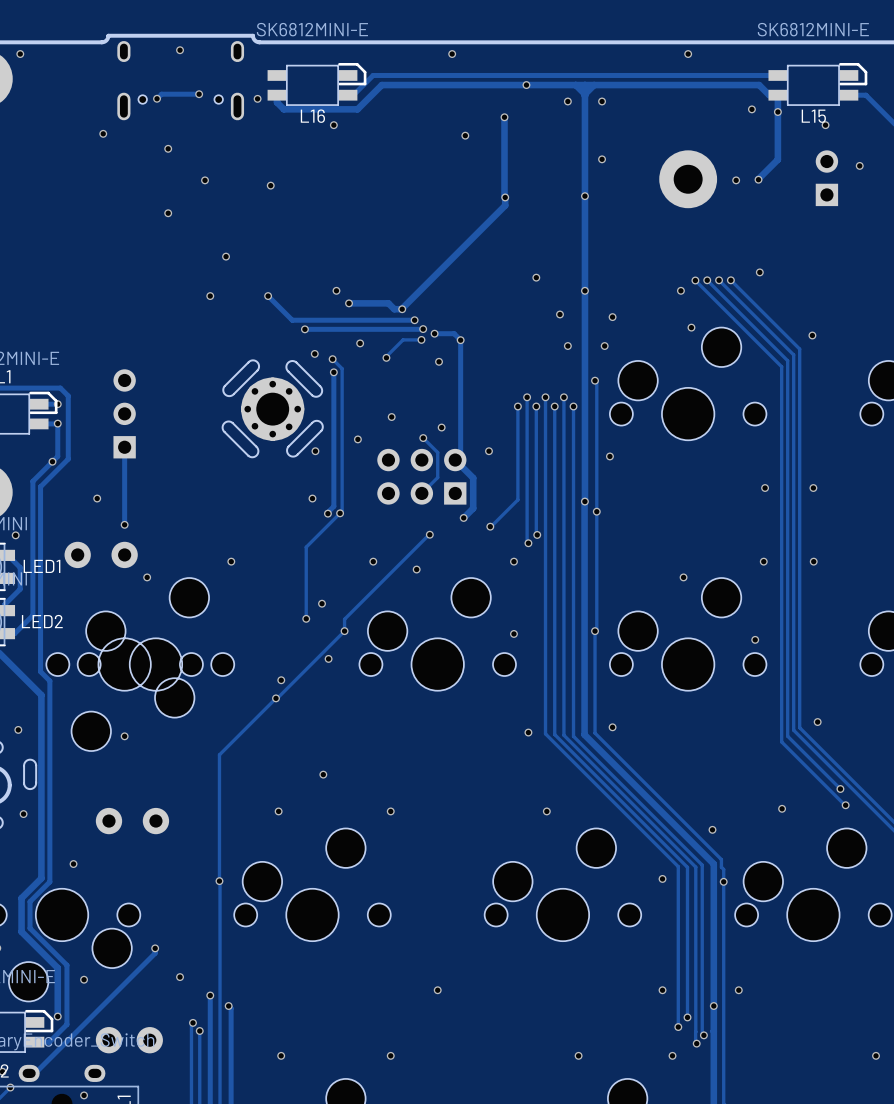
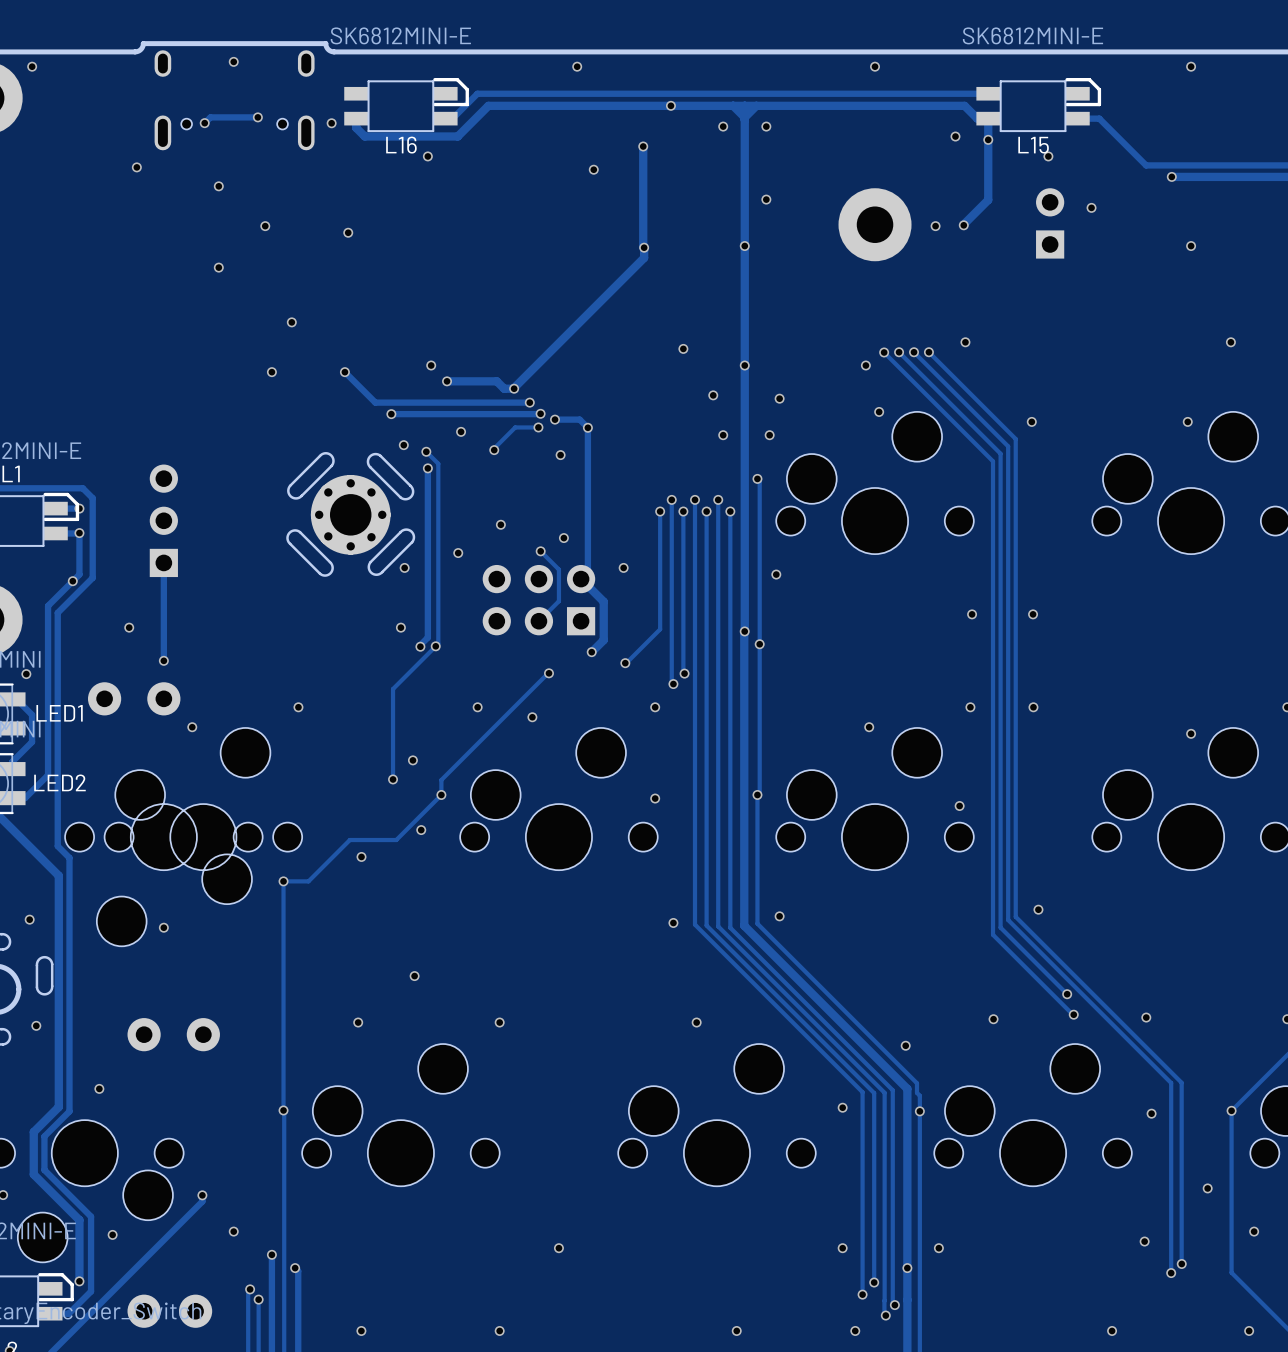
track: (308, 666) (219, 754) -> (396, 840) (349, 840) (308, 881) (283, 881) (283, 951)
via position: (276, 698) -> (283, 881)

